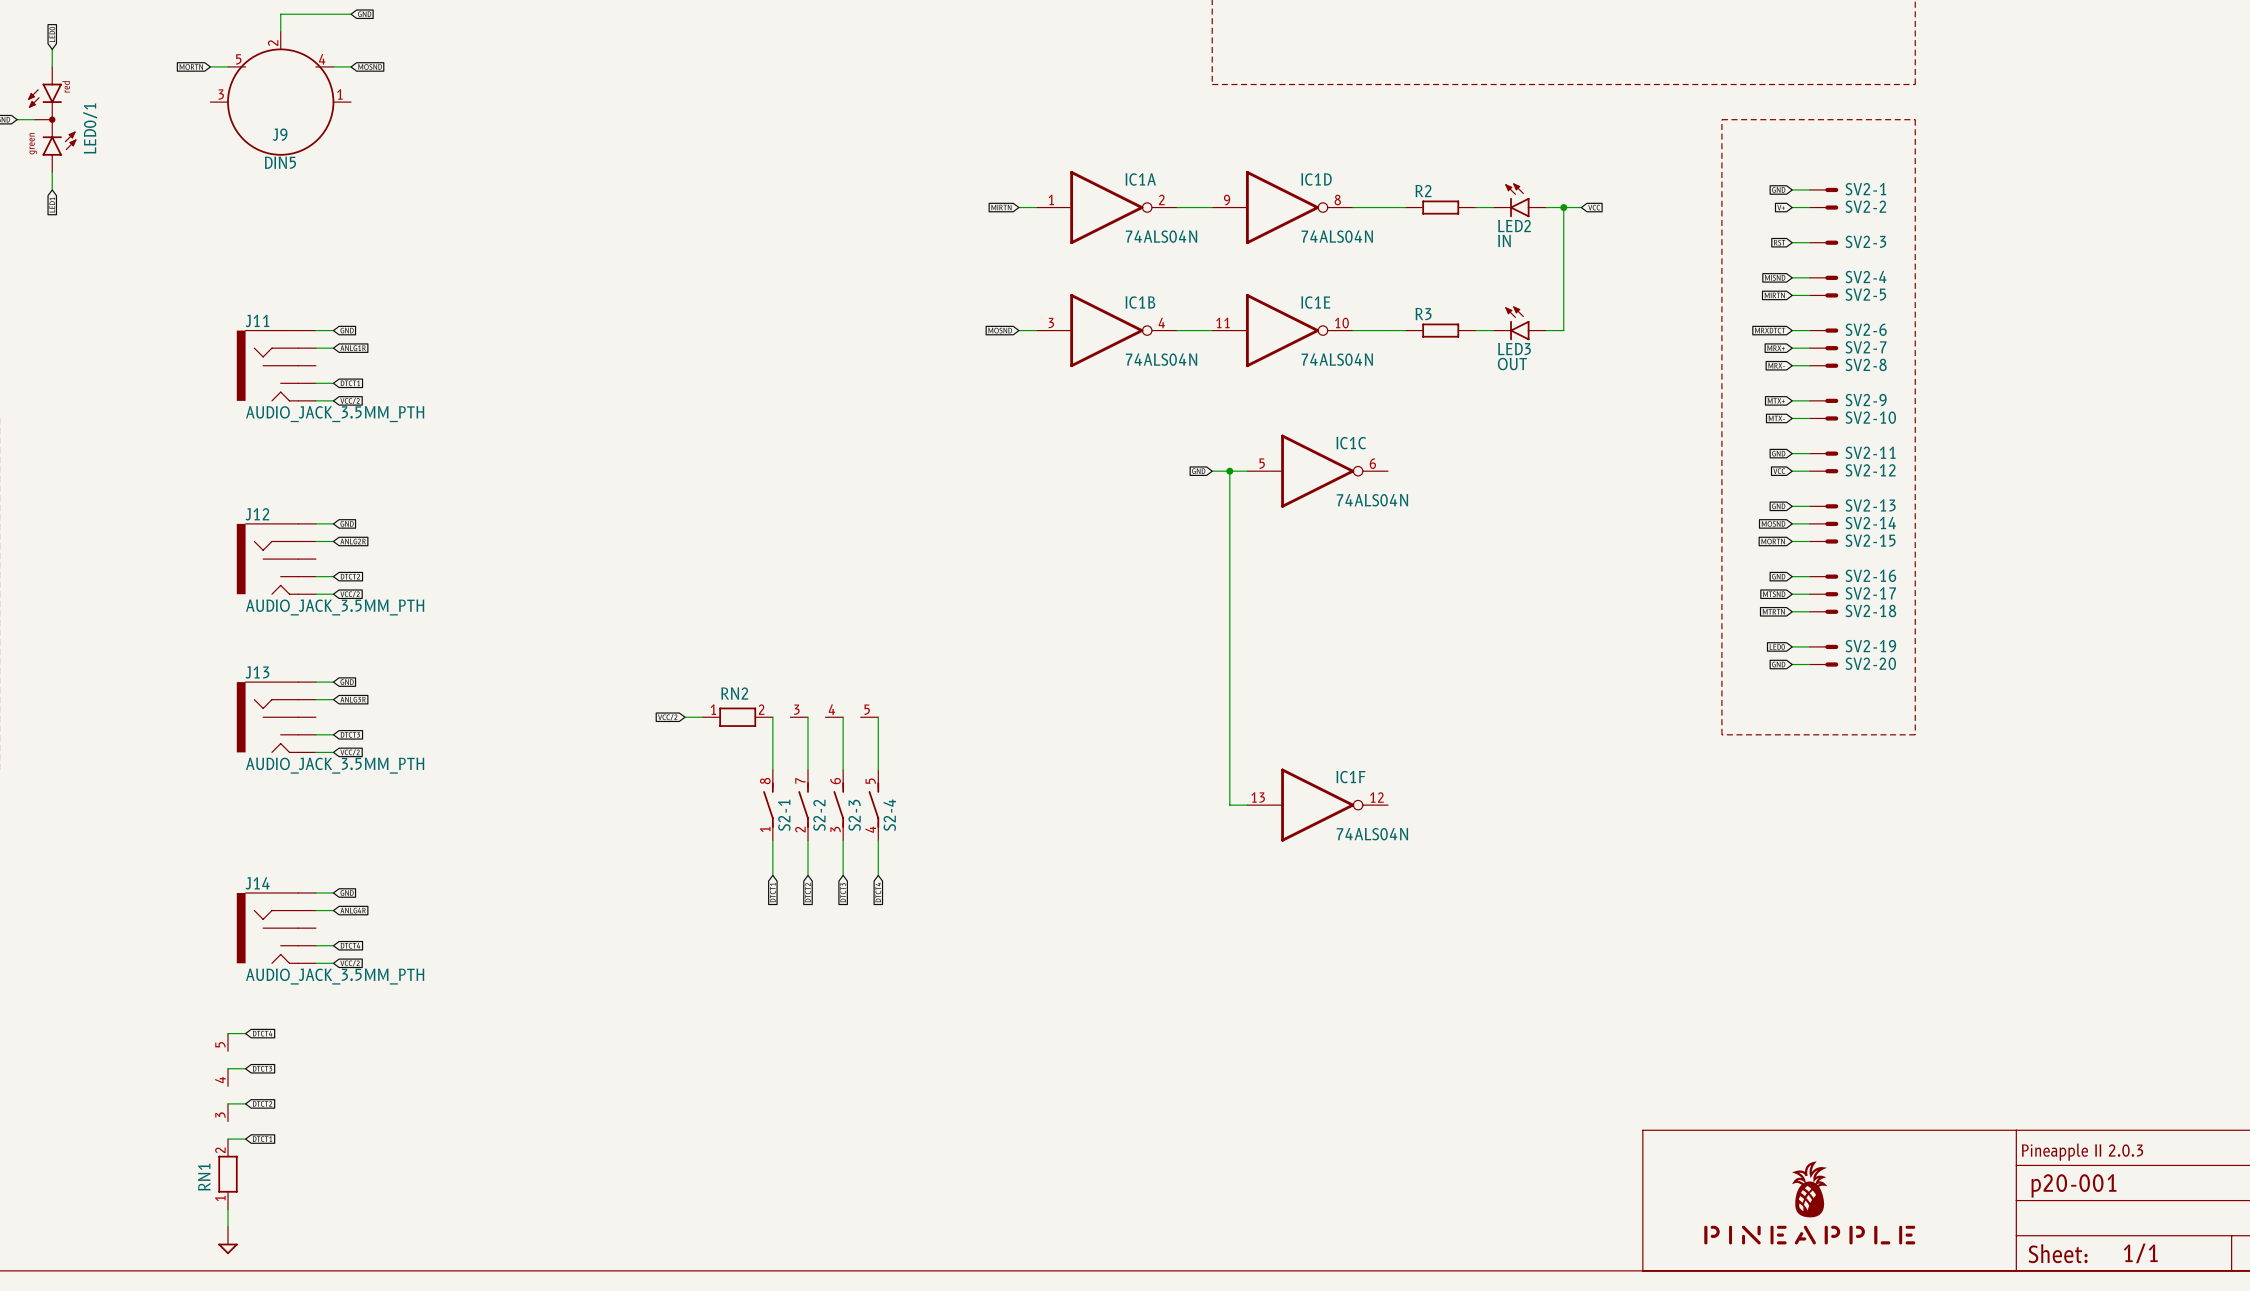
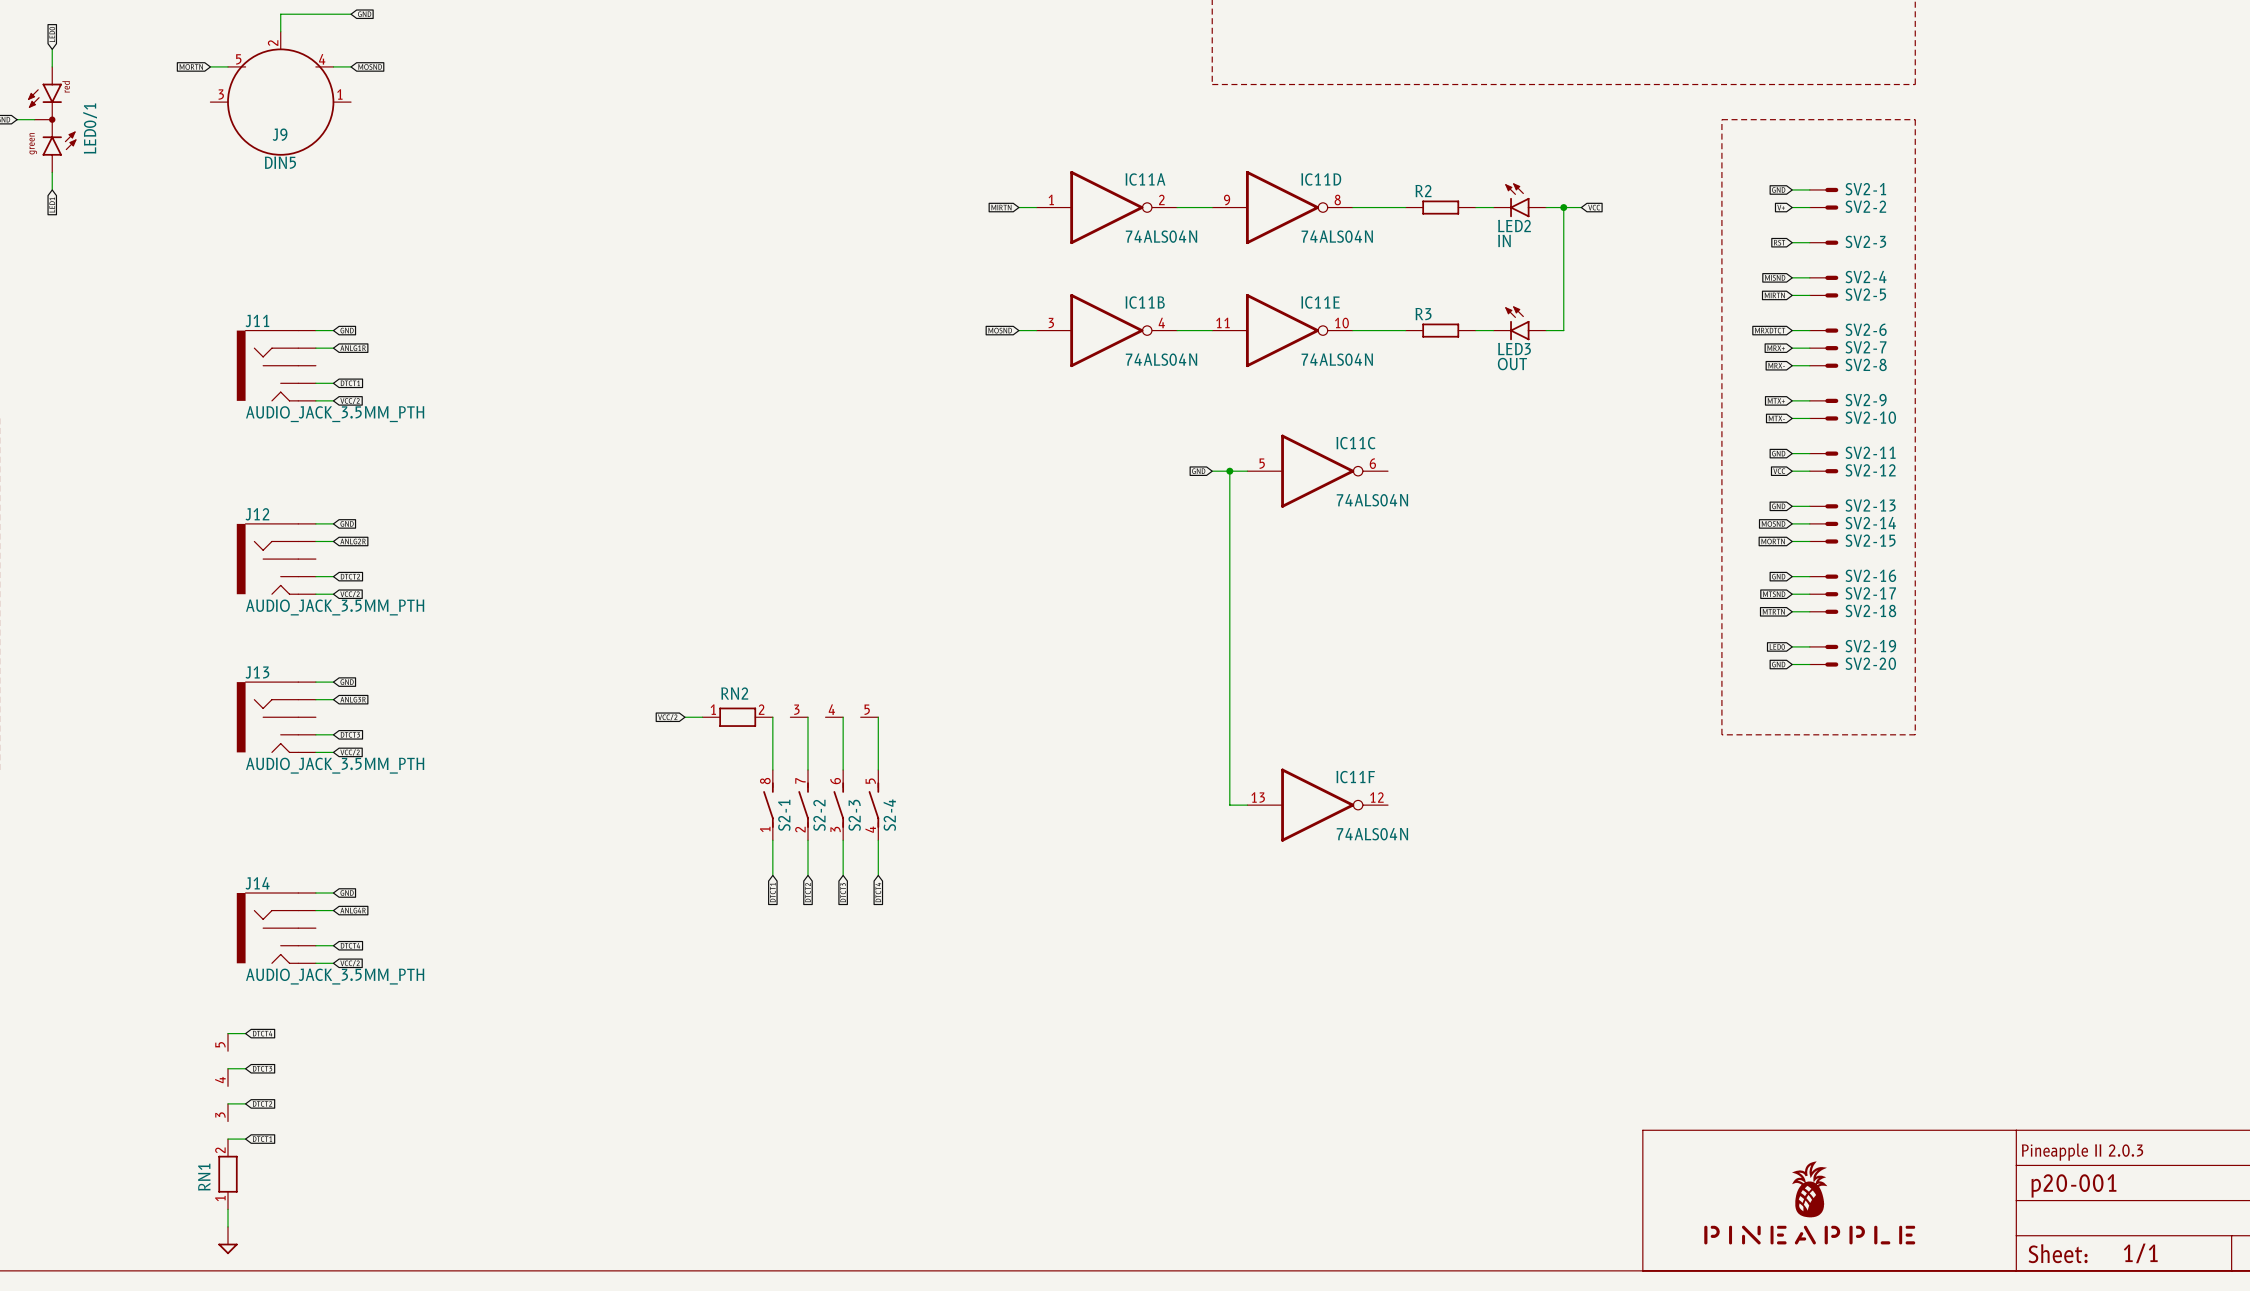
IC1A name: IC1A (1140, 179) -> IC11A (1145, 179)
IC1D name: IC1D (1316, 179) -> IC11D (1321, 179)
IC1B name: IC1B (1140, 302) -> IC11B (1145, 302)
IC1E name: IC1E (1315, 302) -> IC11E (1320, 302)
IC1C name: IC1C (1351, 443) -> IC11C (1355, 443)
IC1F name: IC1F (1350, 777) -> IC11F (1355, 777)

